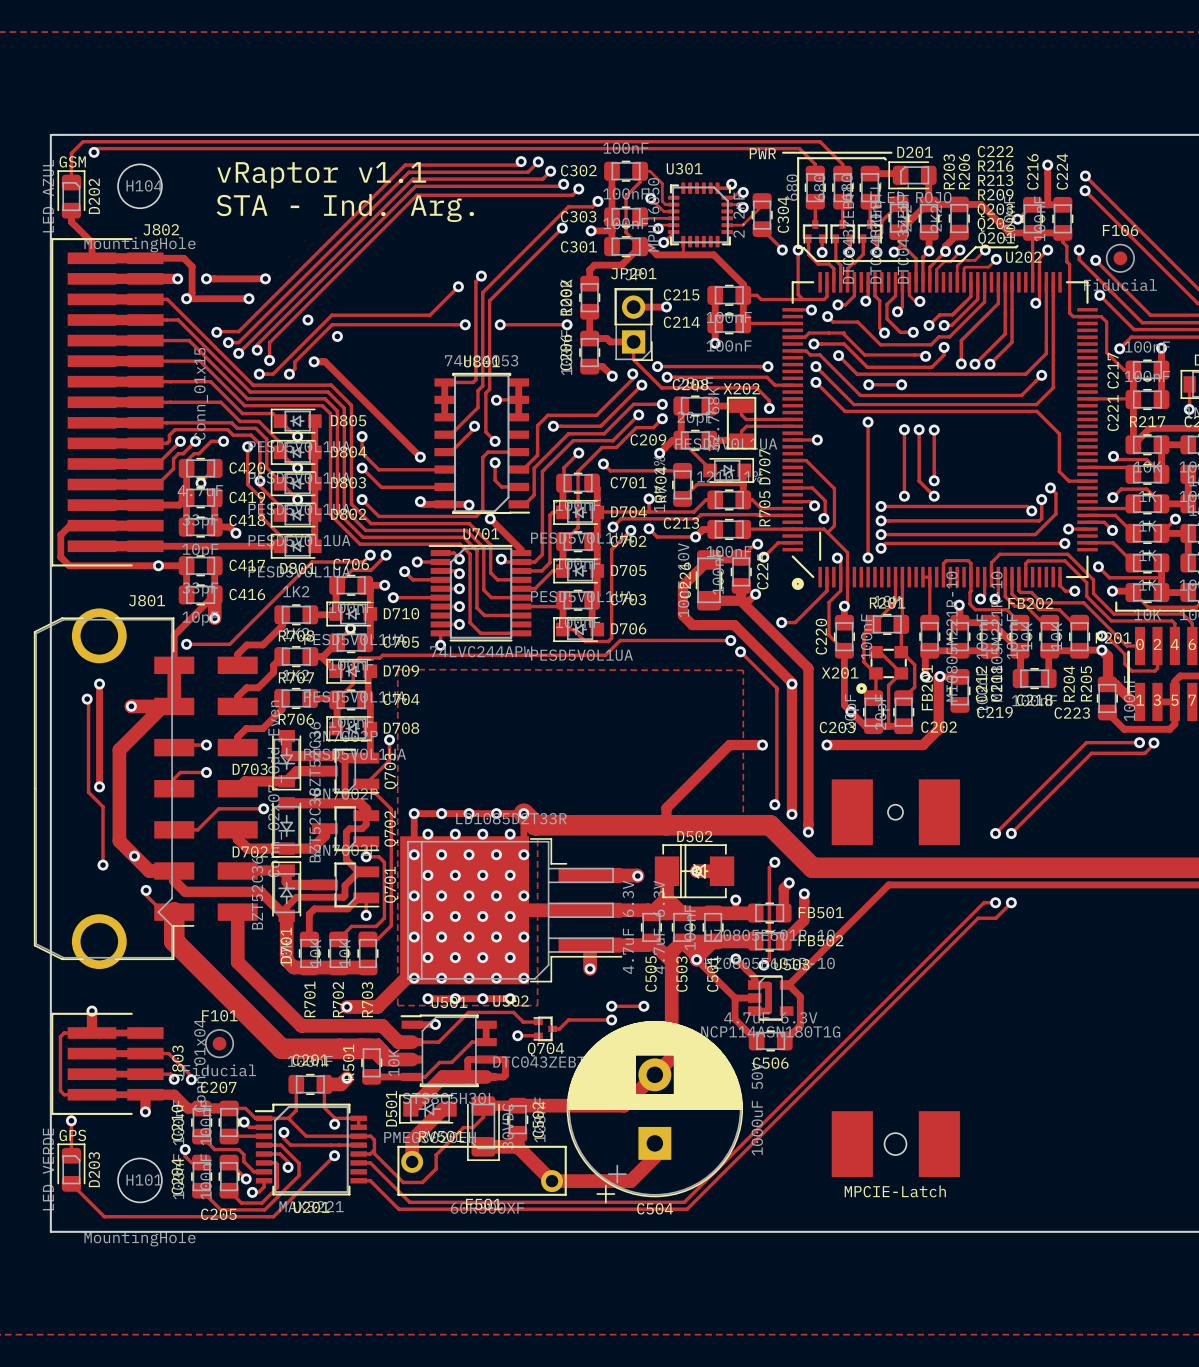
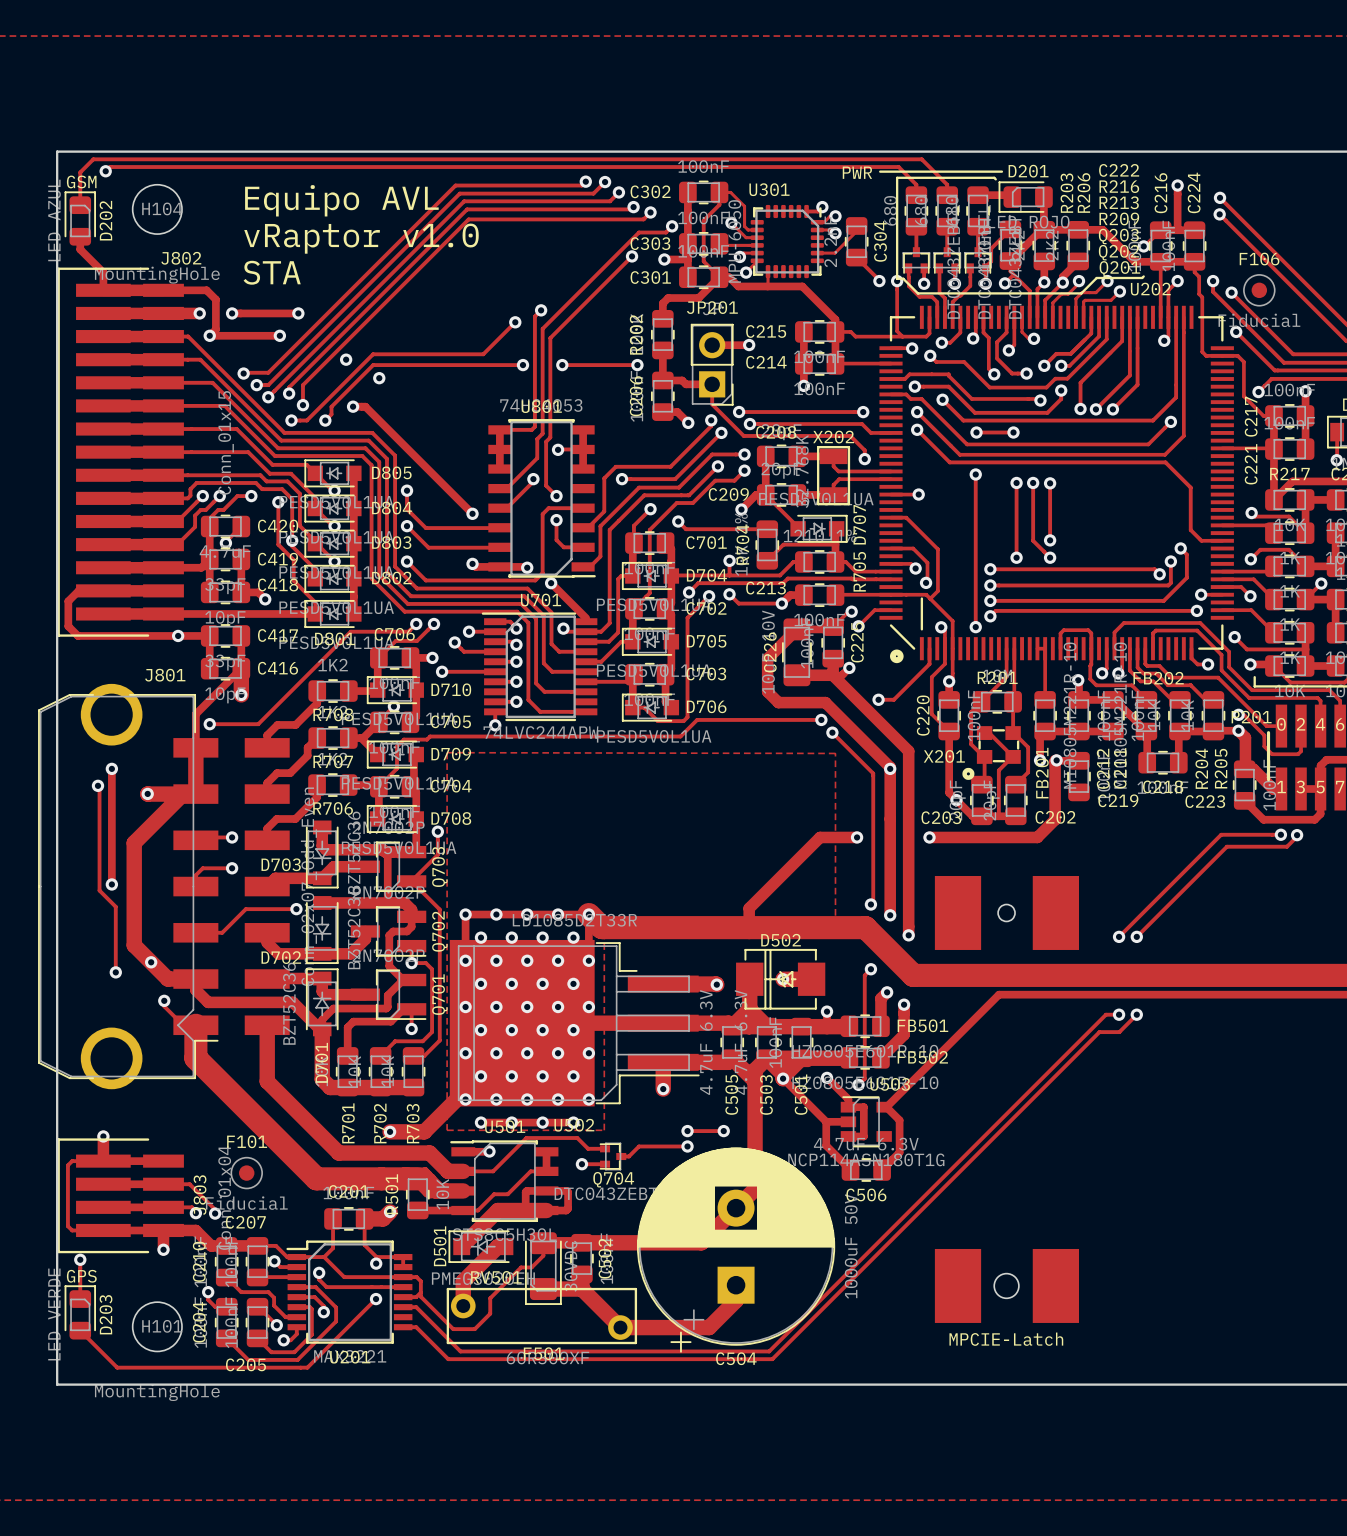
text: vRaptor v1.1 (321, 175) -> Equipo AVL (341, 200)
text: STA - Ind. Arg. (345, 208) -> vRaptor v1.0 (361, 238)
text: none -> STA (272, 272)

